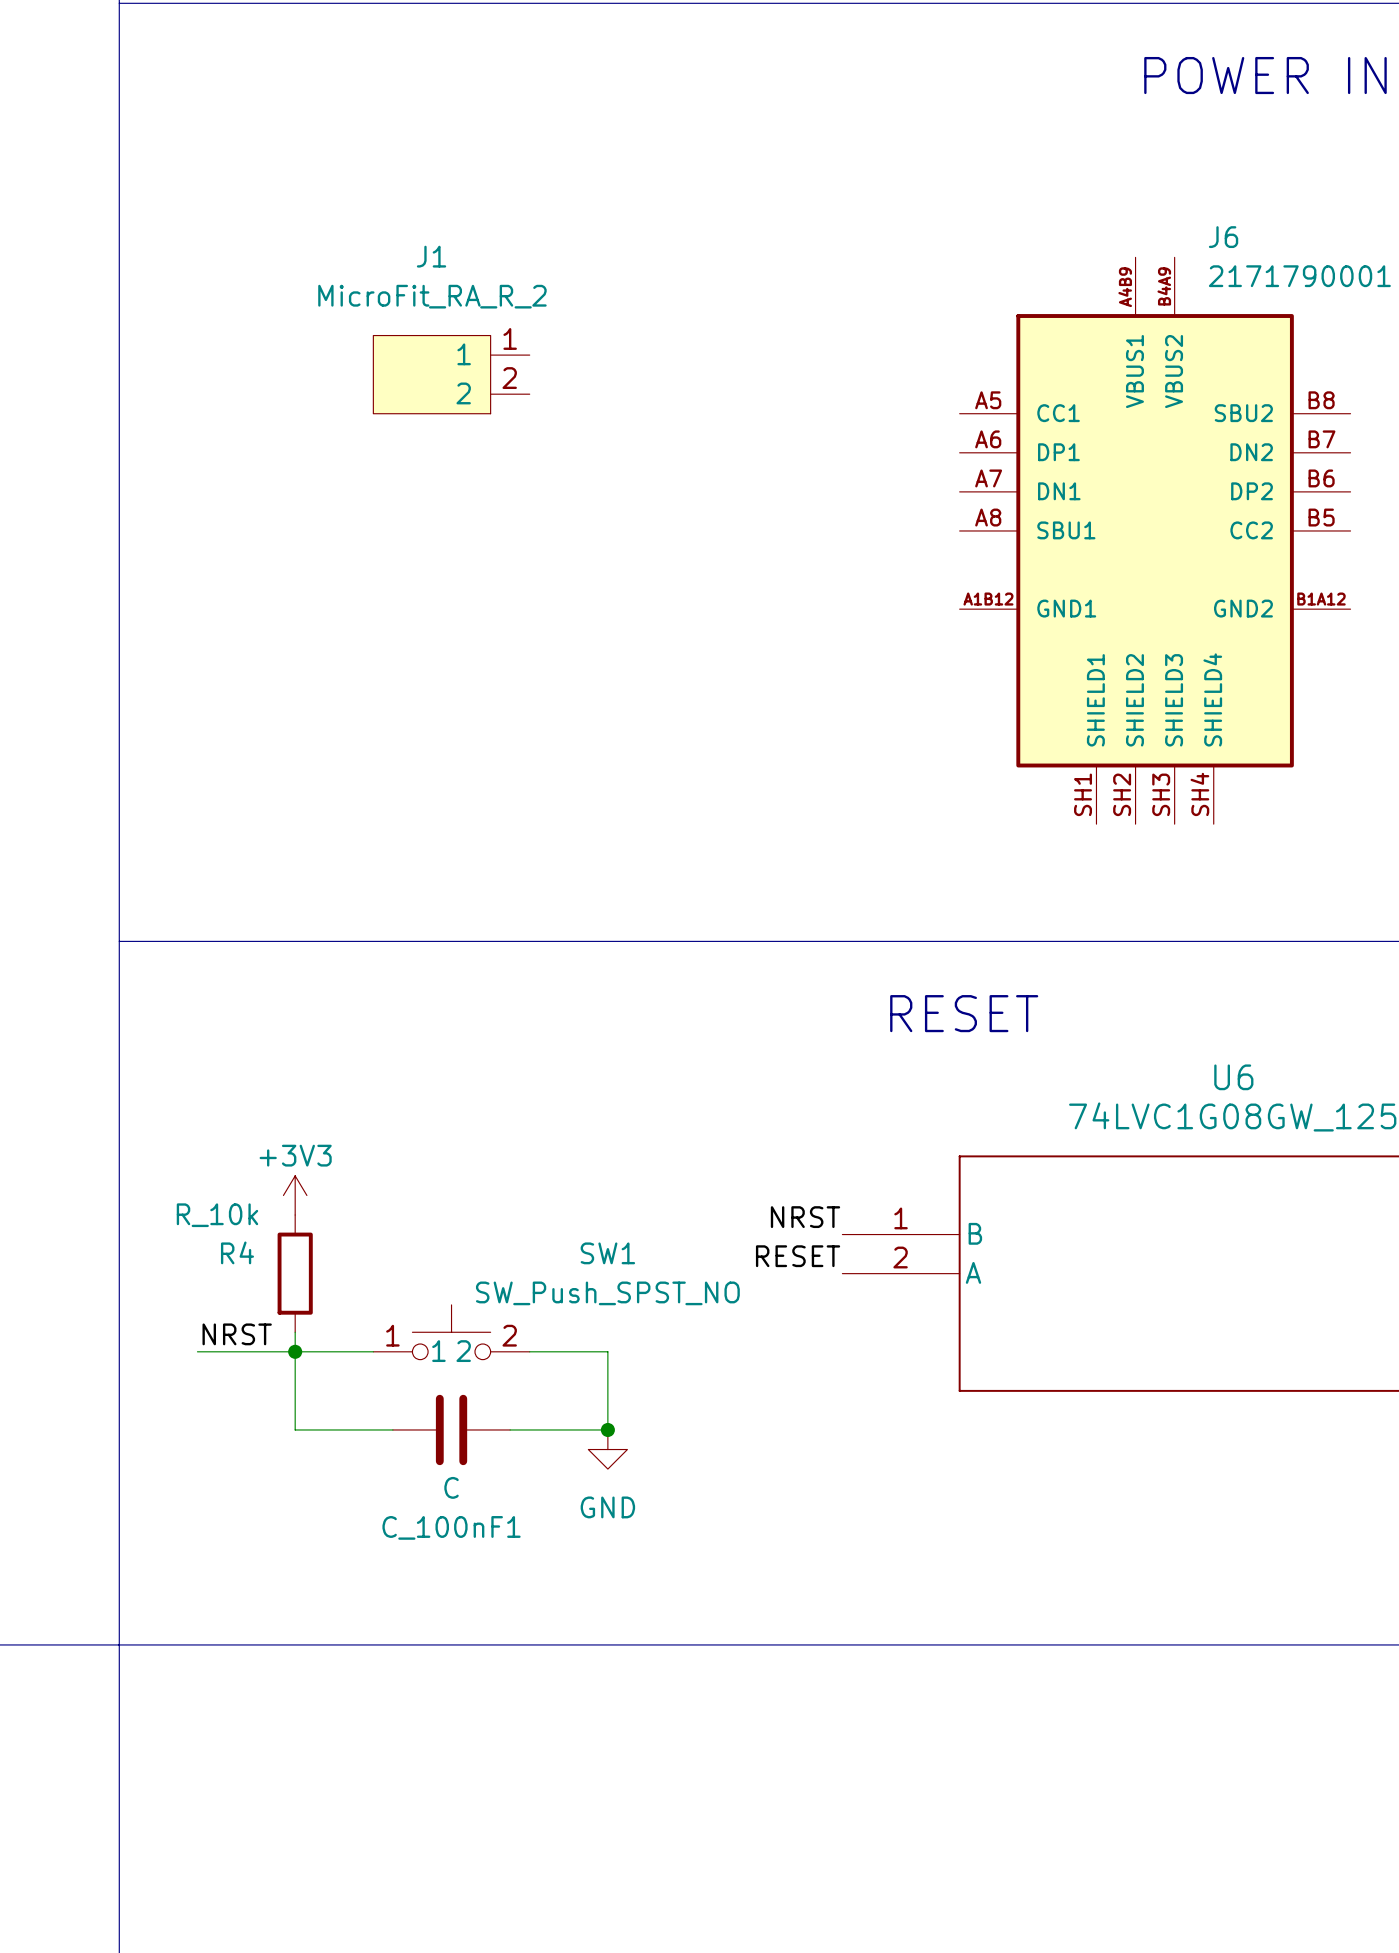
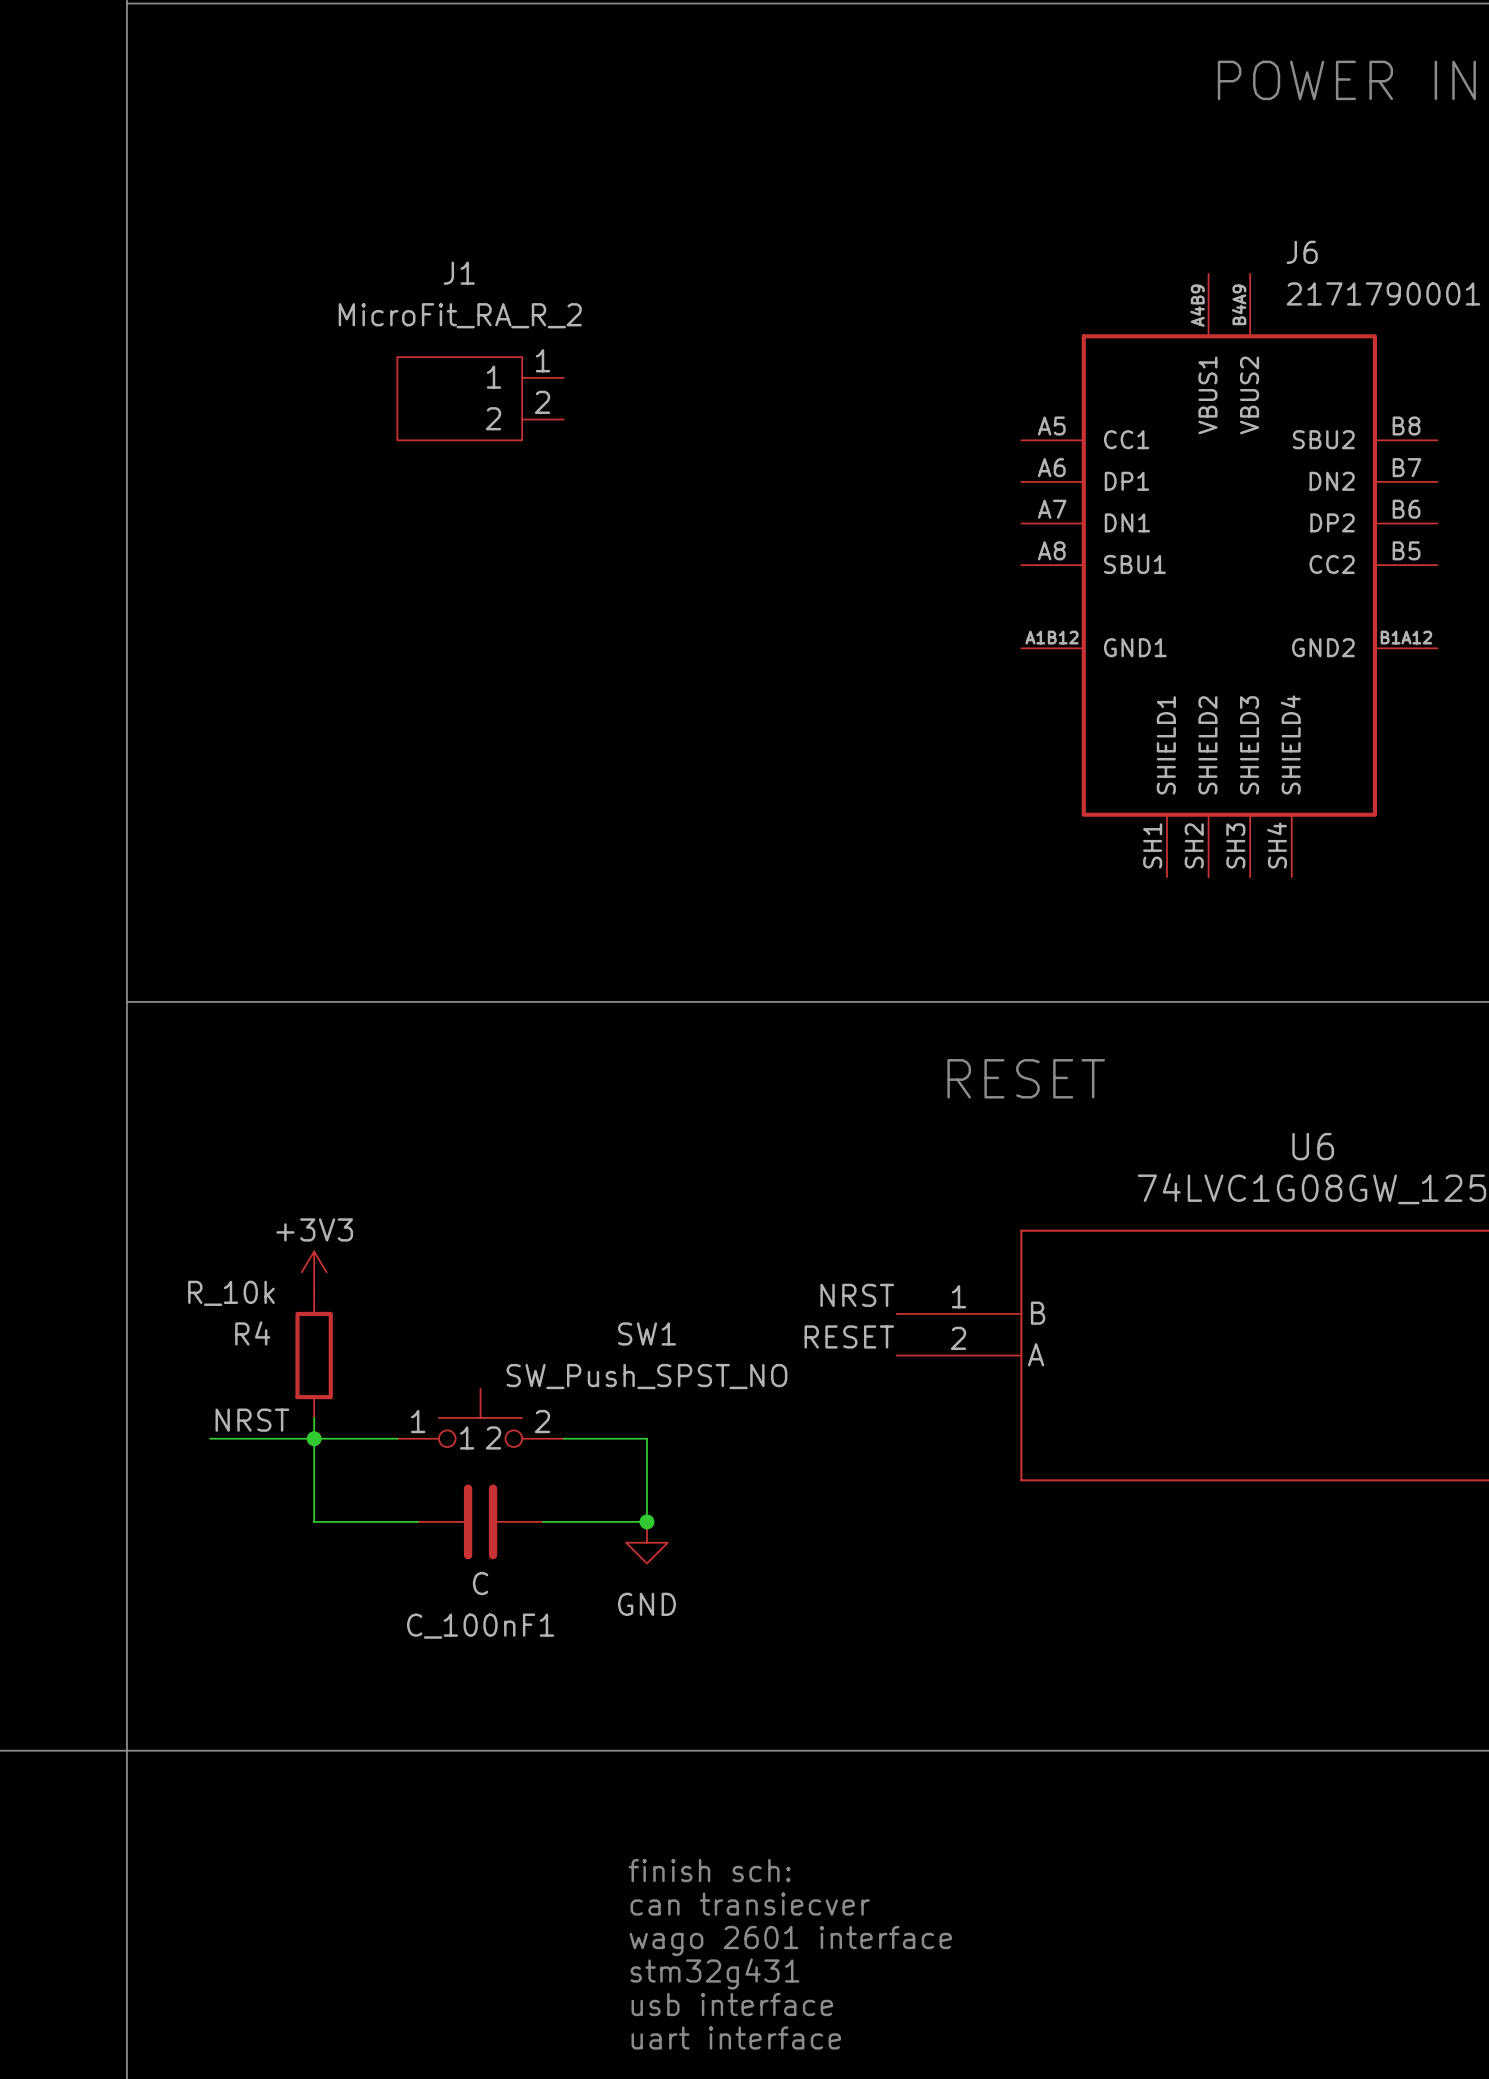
text: none -> finish sch: (709, 1870)
text: none -> can transiecver (750, 1904)
text: none -> wago 2601 interface (790, 1940)
text: none -> stm32g431 (714, 1973)
text: none -> usb interface (732, 2004)
text: none -> uart interface (736, 2037)

